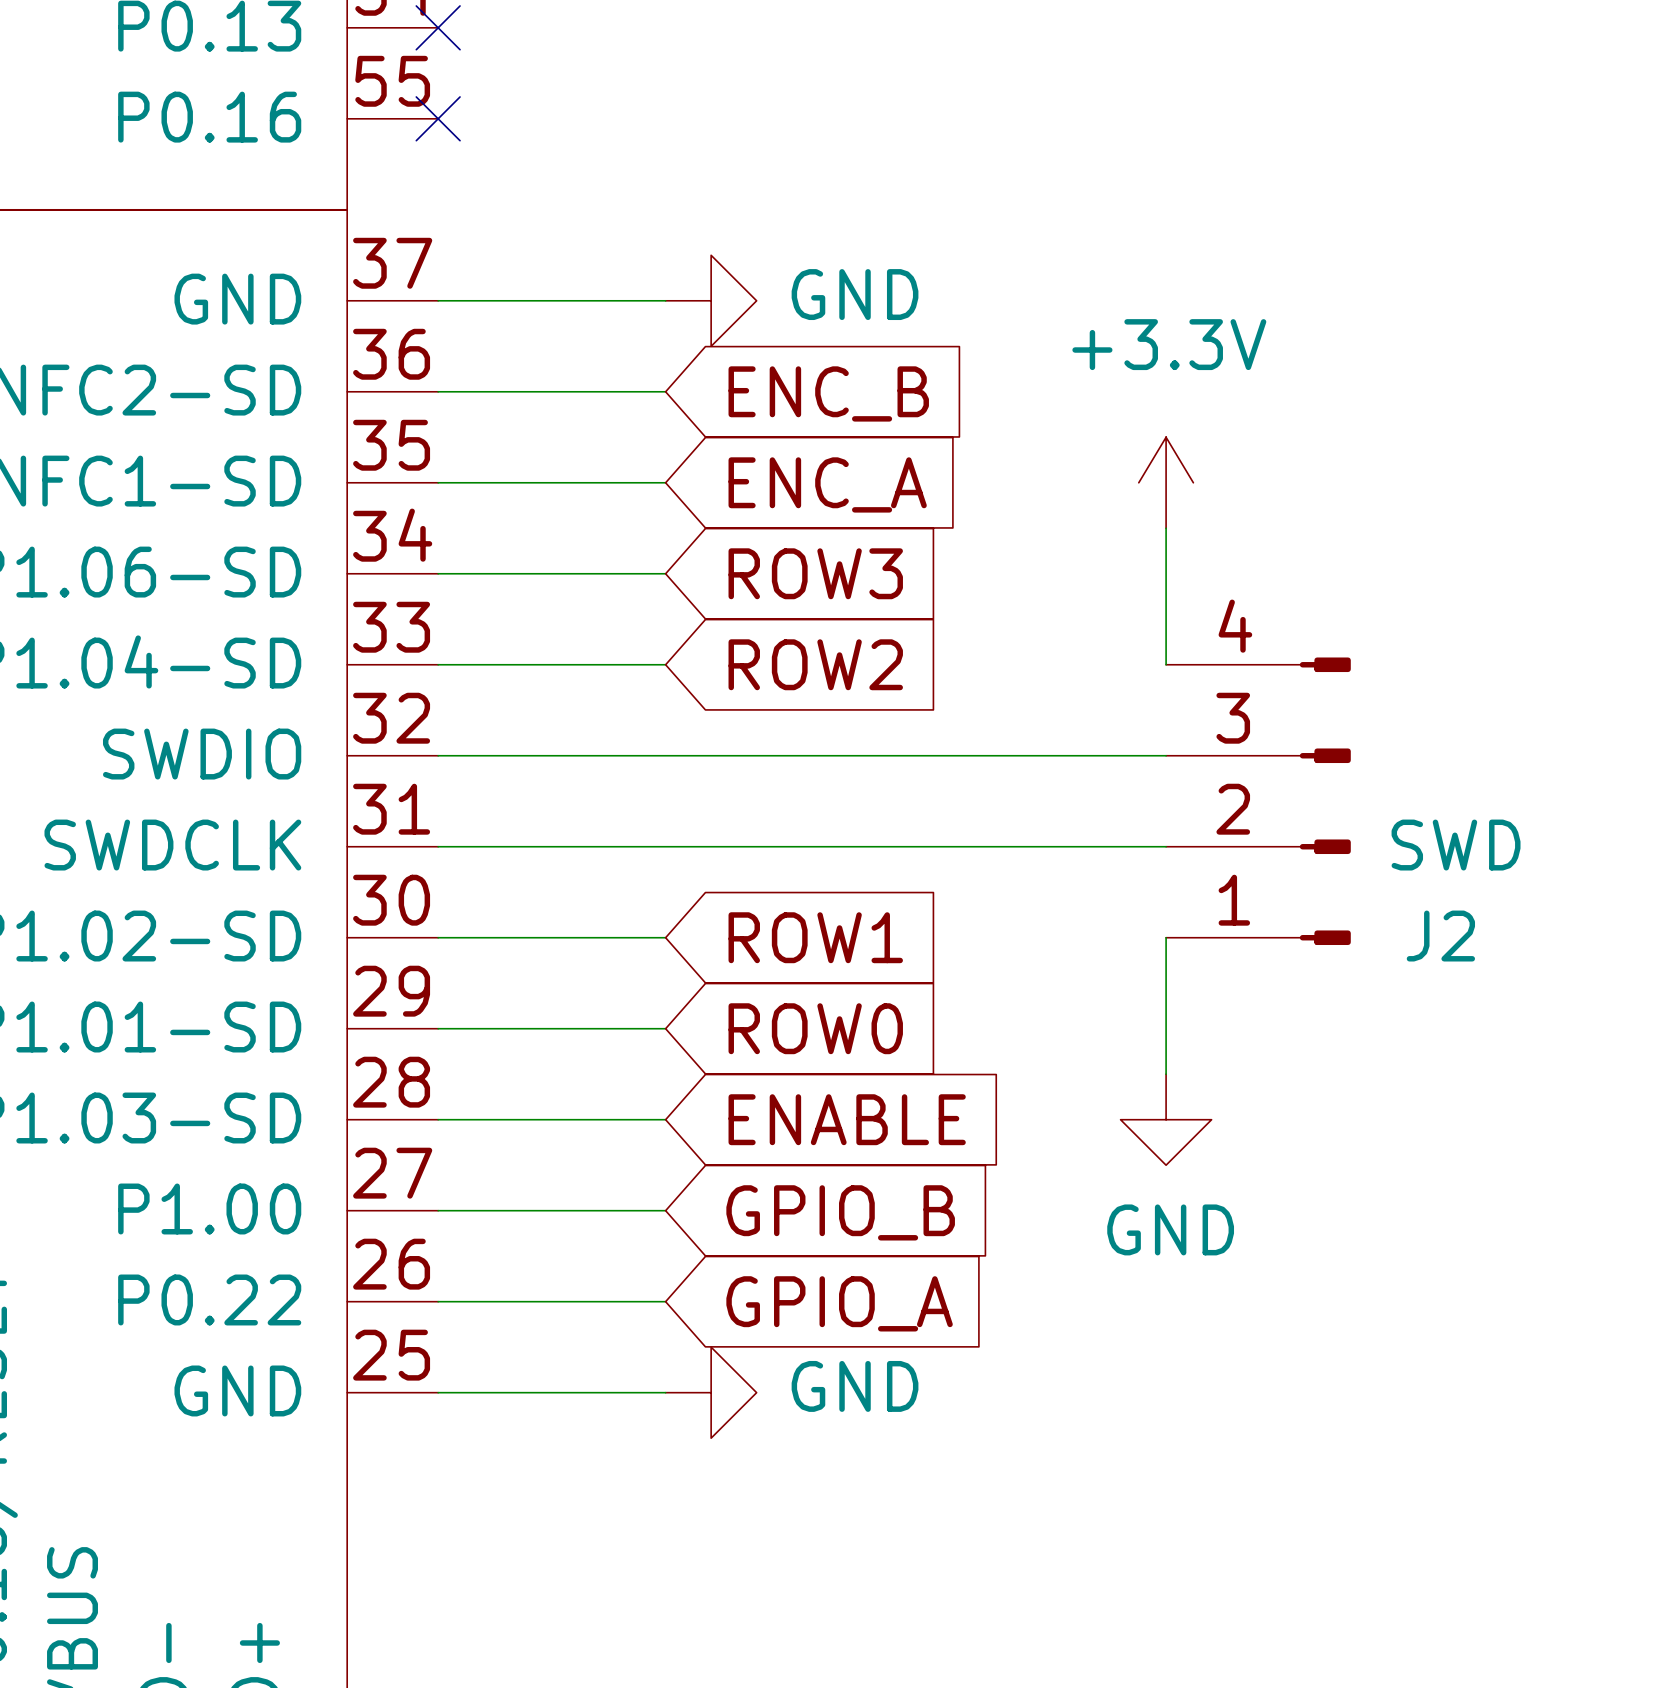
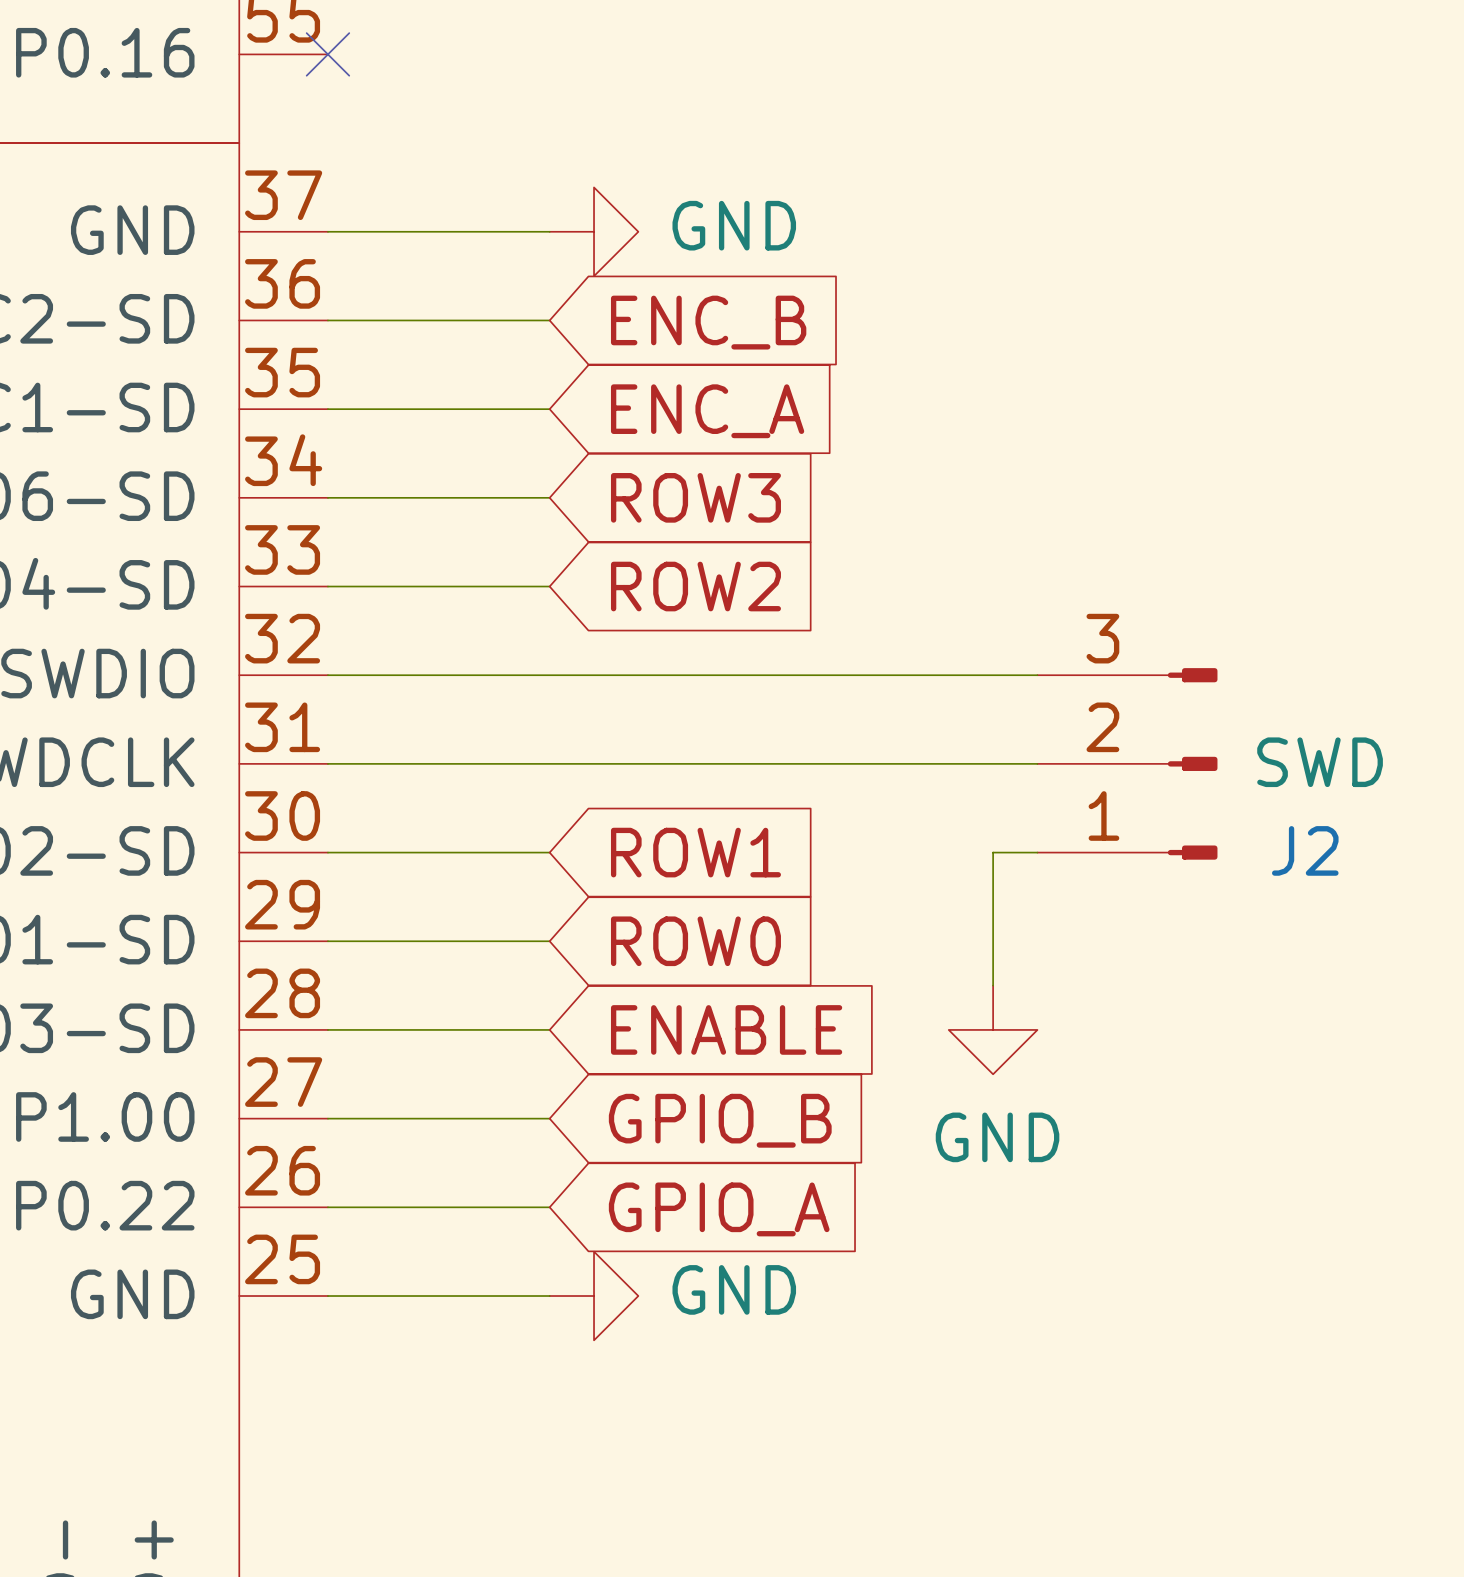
power symbol: +3.3V (1166, 482) -> none
wire: (1166, 528) (1166, 664) -> none
J2 symbol: [1166, 657, 1351, 946] -> [1037, 668, 1218, 860]
wire: (1166, 937) (1166, 1074) -> (1037, 852) (993, 852) (993, 985)
power symbol position: GND (1166, 1119) -> GND (993, 1029)

